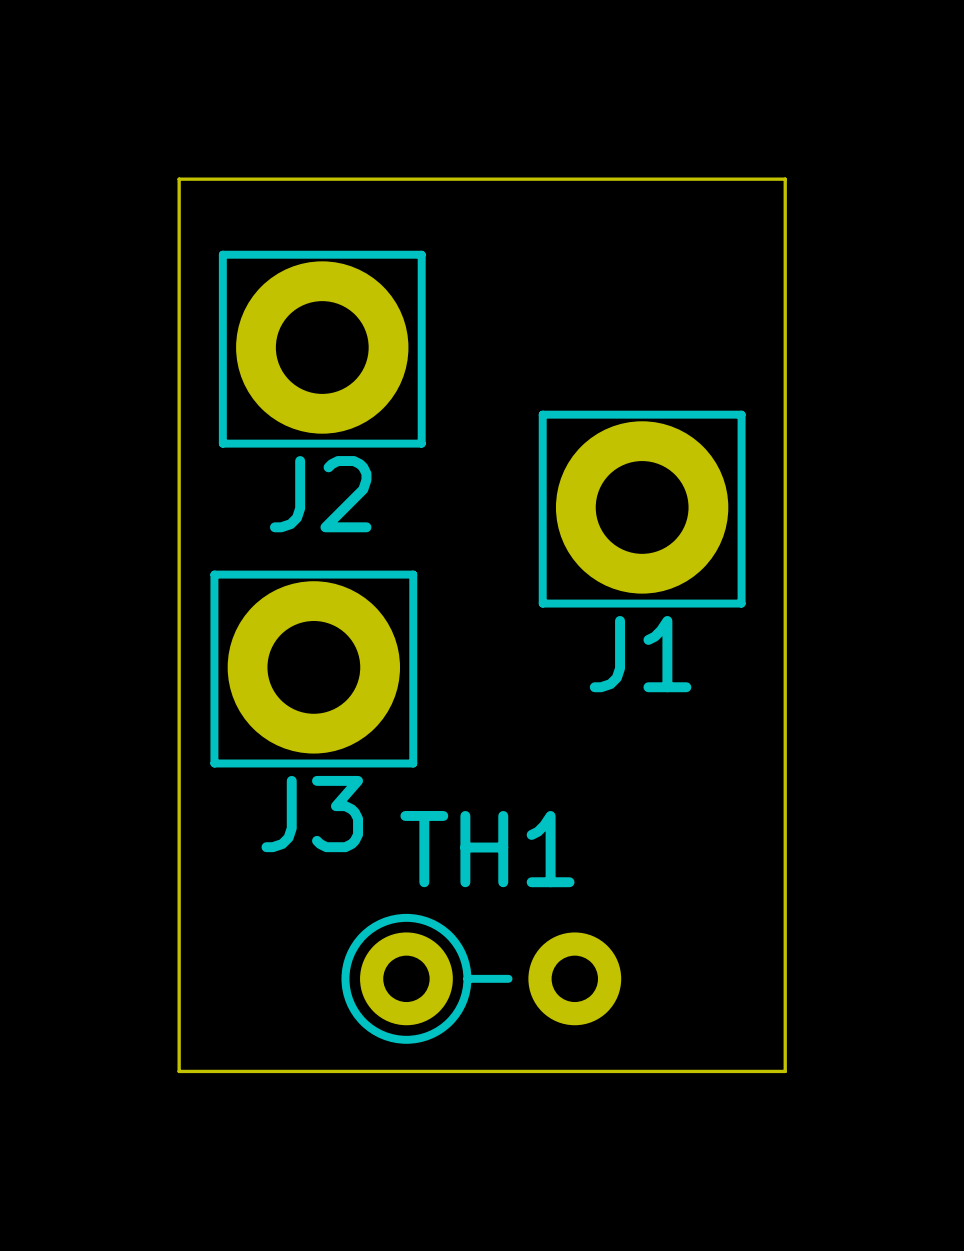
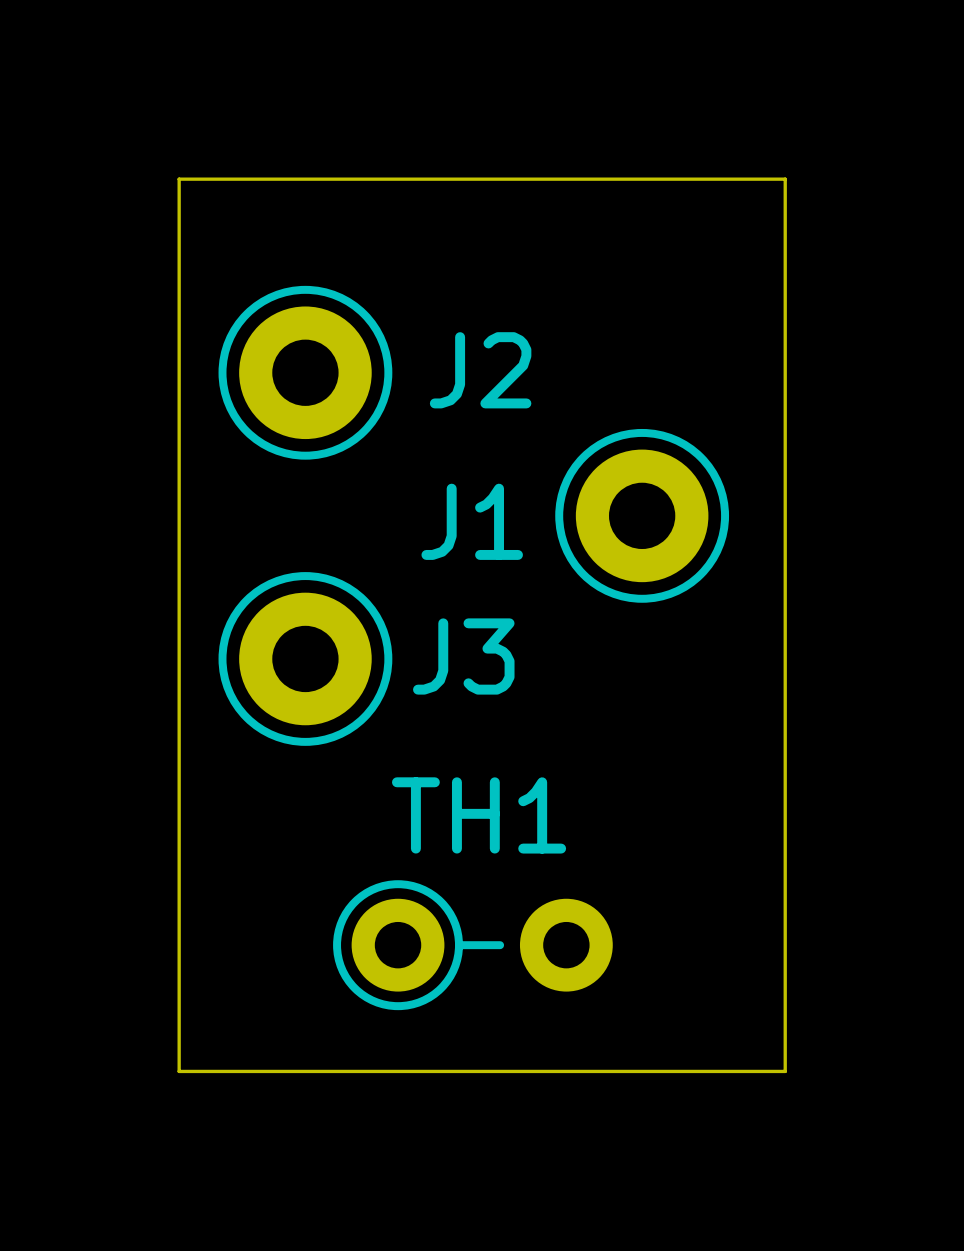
J2 footprint: [218, 250, 426, 448] -> [218, 285, 393, 460]
J1 footprint: [538, 410, 746, 608] -> [555, 428, 730, 603]
J2 name position: J2 (320, 494) -> J2 (480, 370)
J3 footprint: [210, 570, 418, 768] -> [218, 572, 393, 746]
J1 name position: J1 (640, 654) -> J1 (472, 521)
J3 name position: J3 (312, 814) -> J3 (463, 656)
TH1 position: (481, 978) -> (472, 945)

